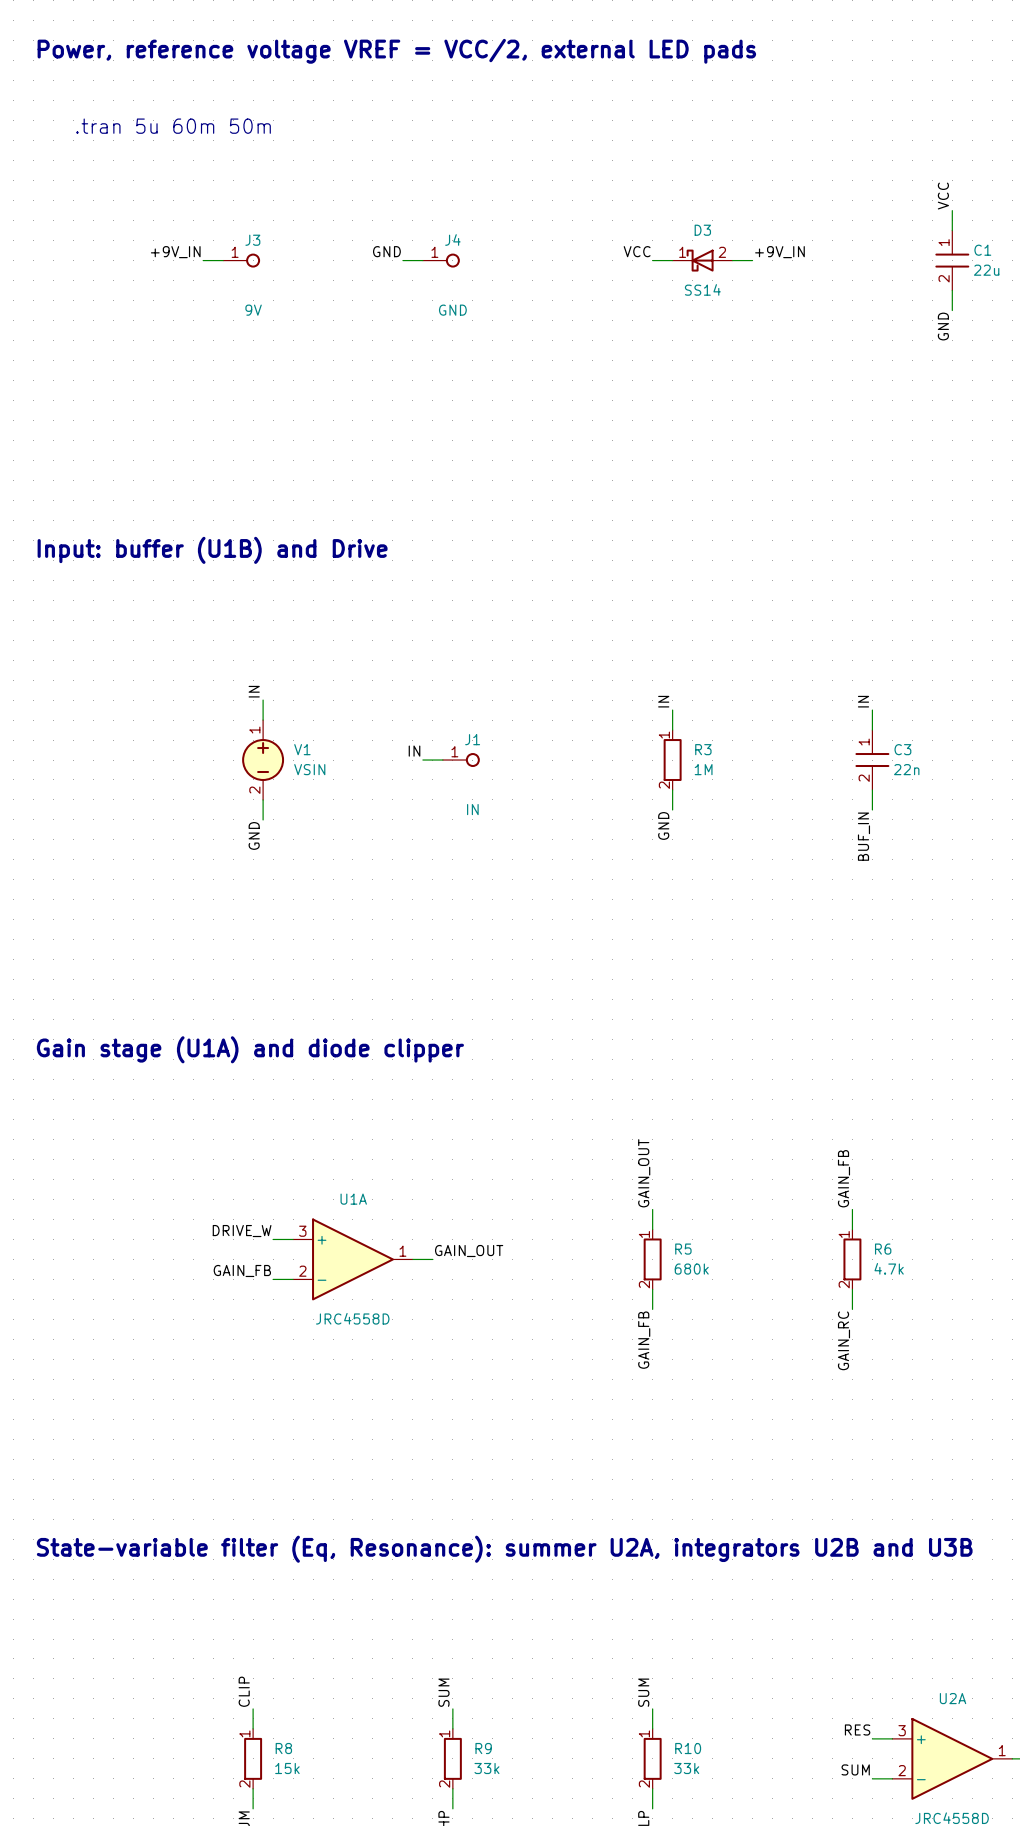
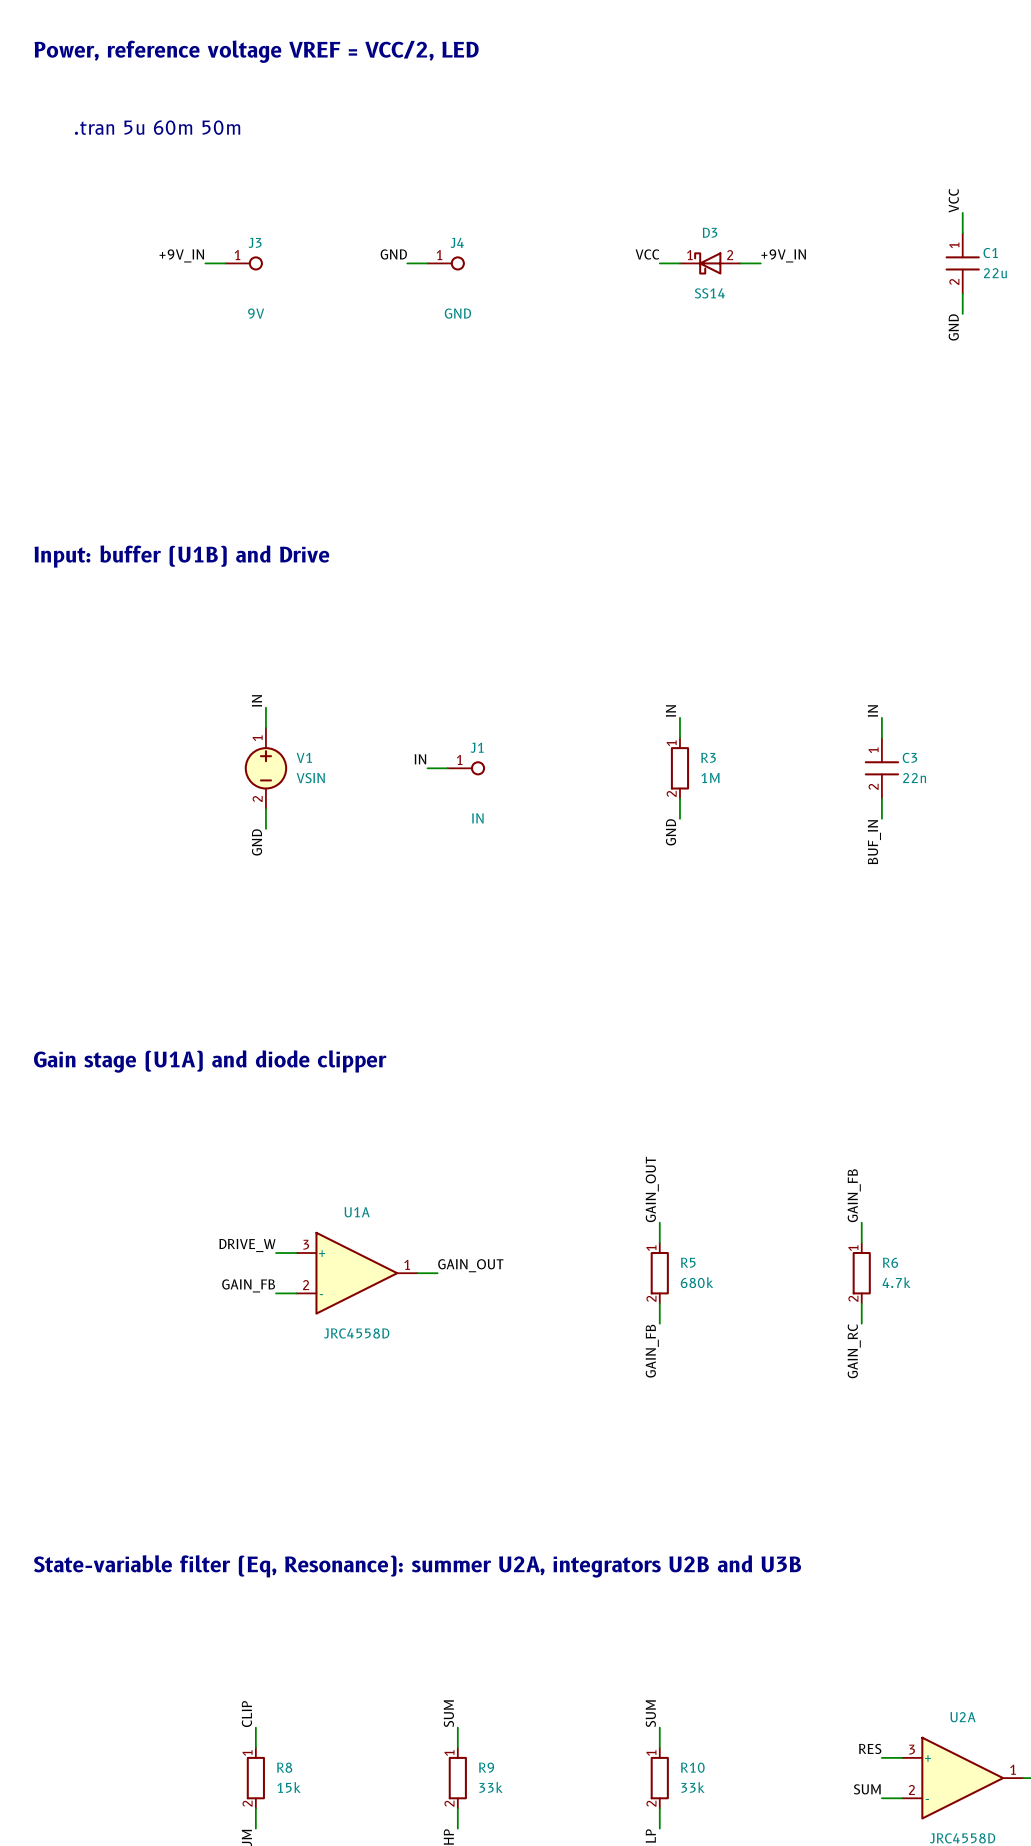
text: Power, reference voltage VREF = VCC/2, external LED pads (396, 51) -> Power, reference voltage VREF = VCC/2, LED (256, 51)

